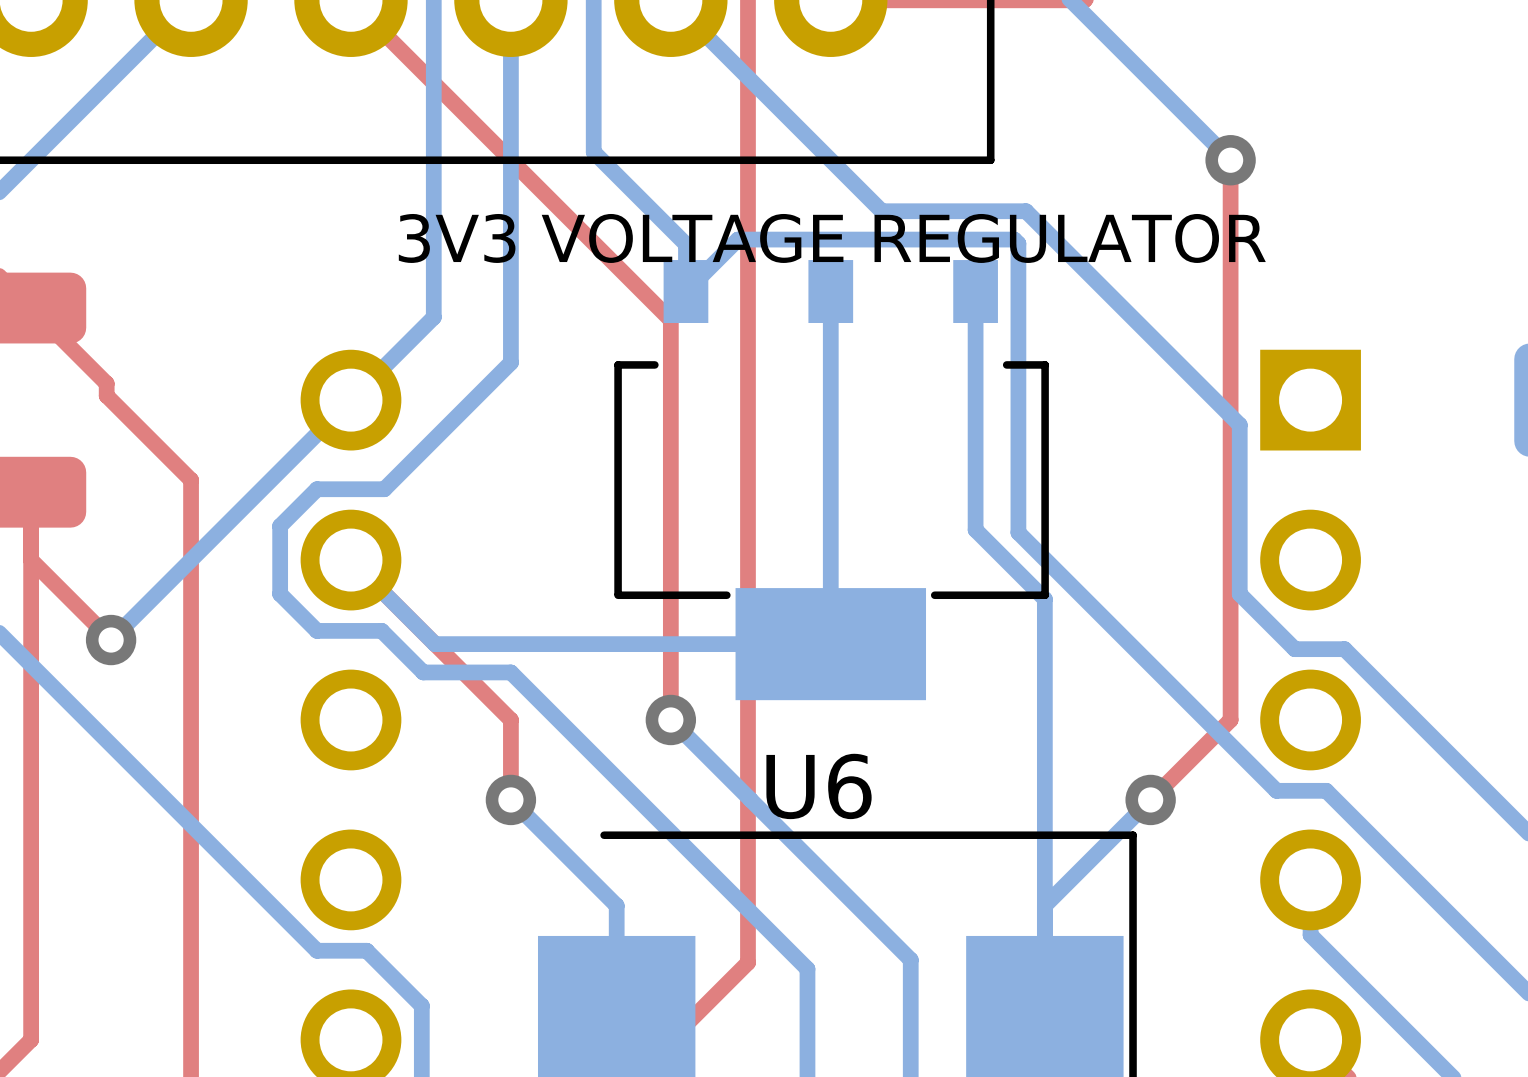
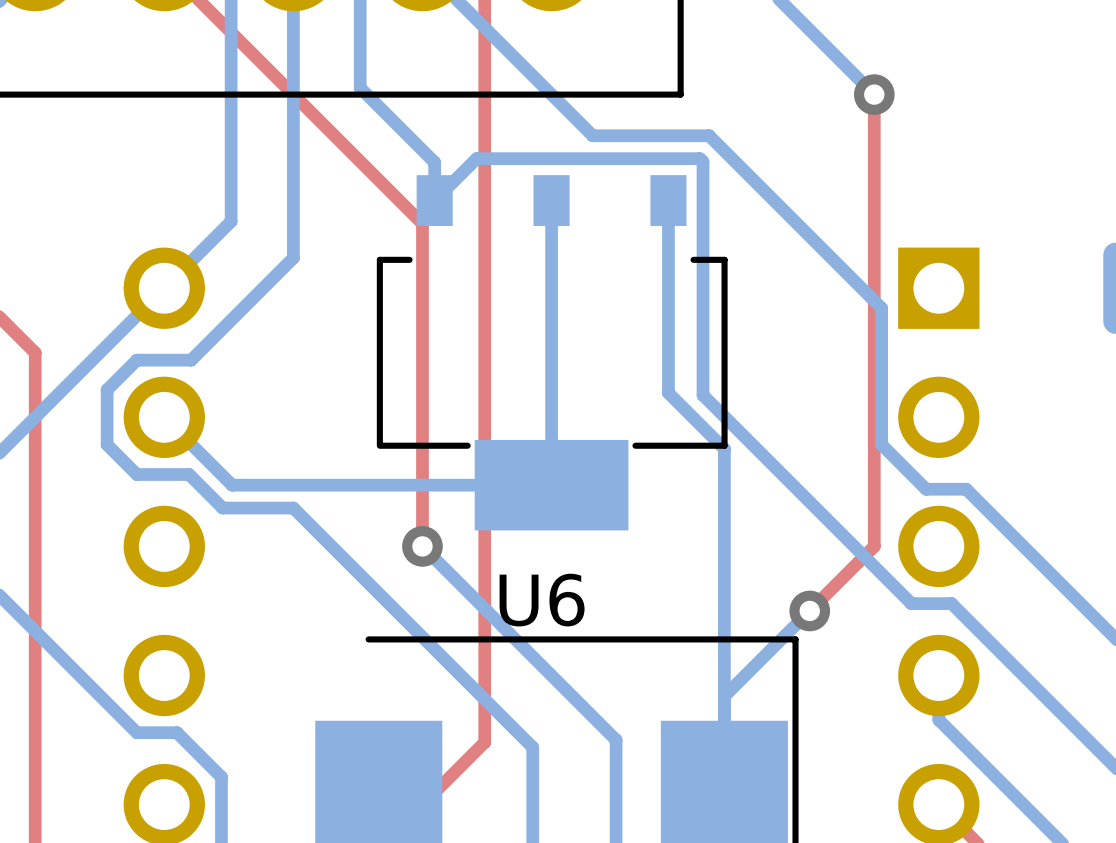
text: 3V3 VOLTAGE REGULATOR (832, 238) -> none
top track: (350, 560) (510, 719) (510, 799) -> none
bottom track: (510, 799) (616, 905) (616, 1039) -> none
via: (510, 799) -> none

